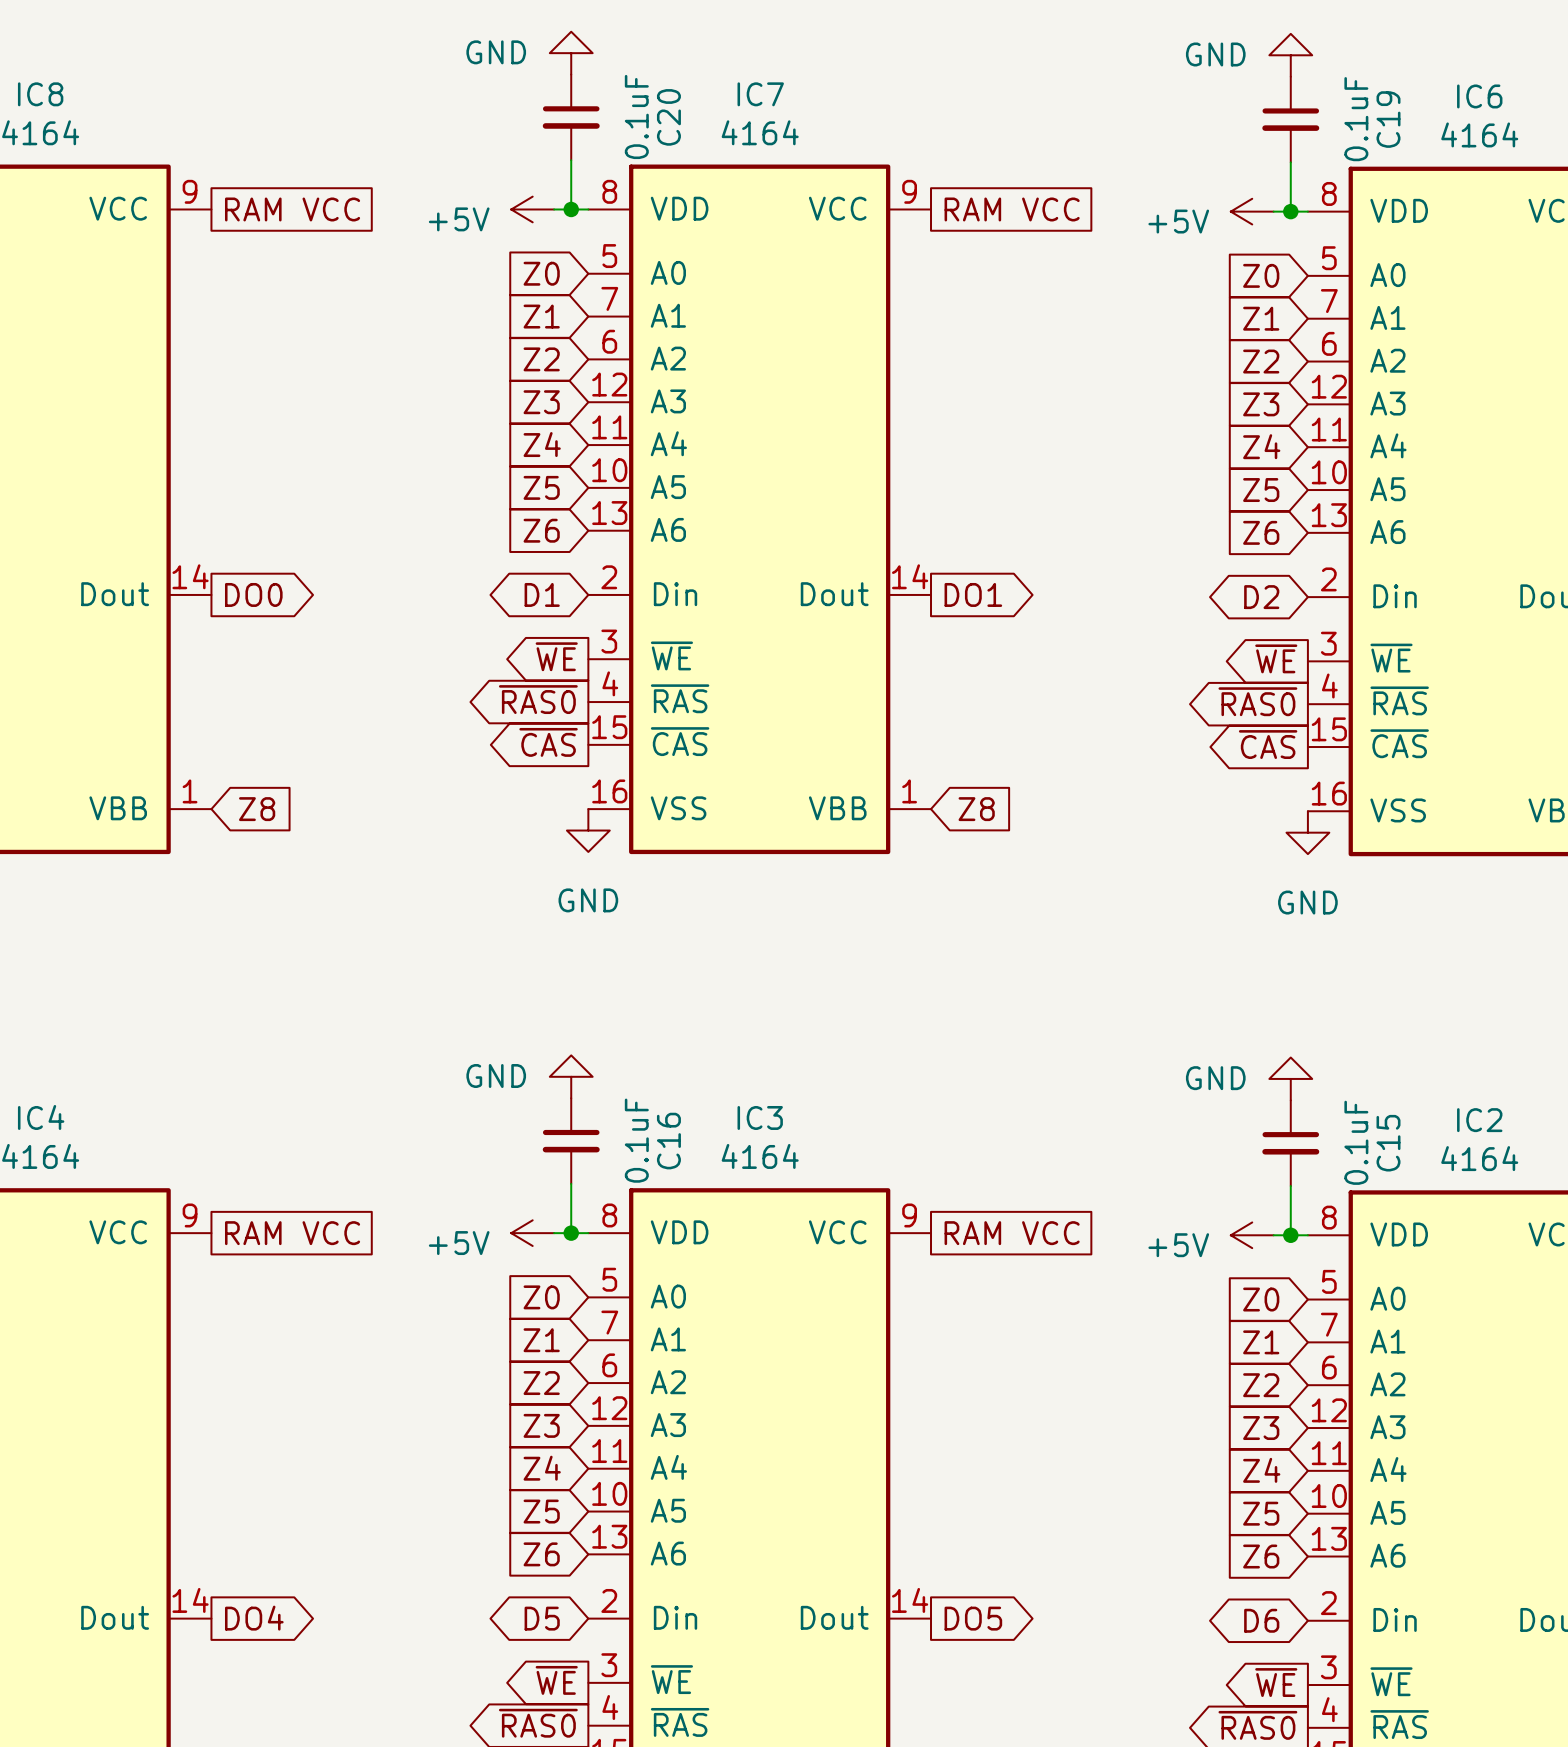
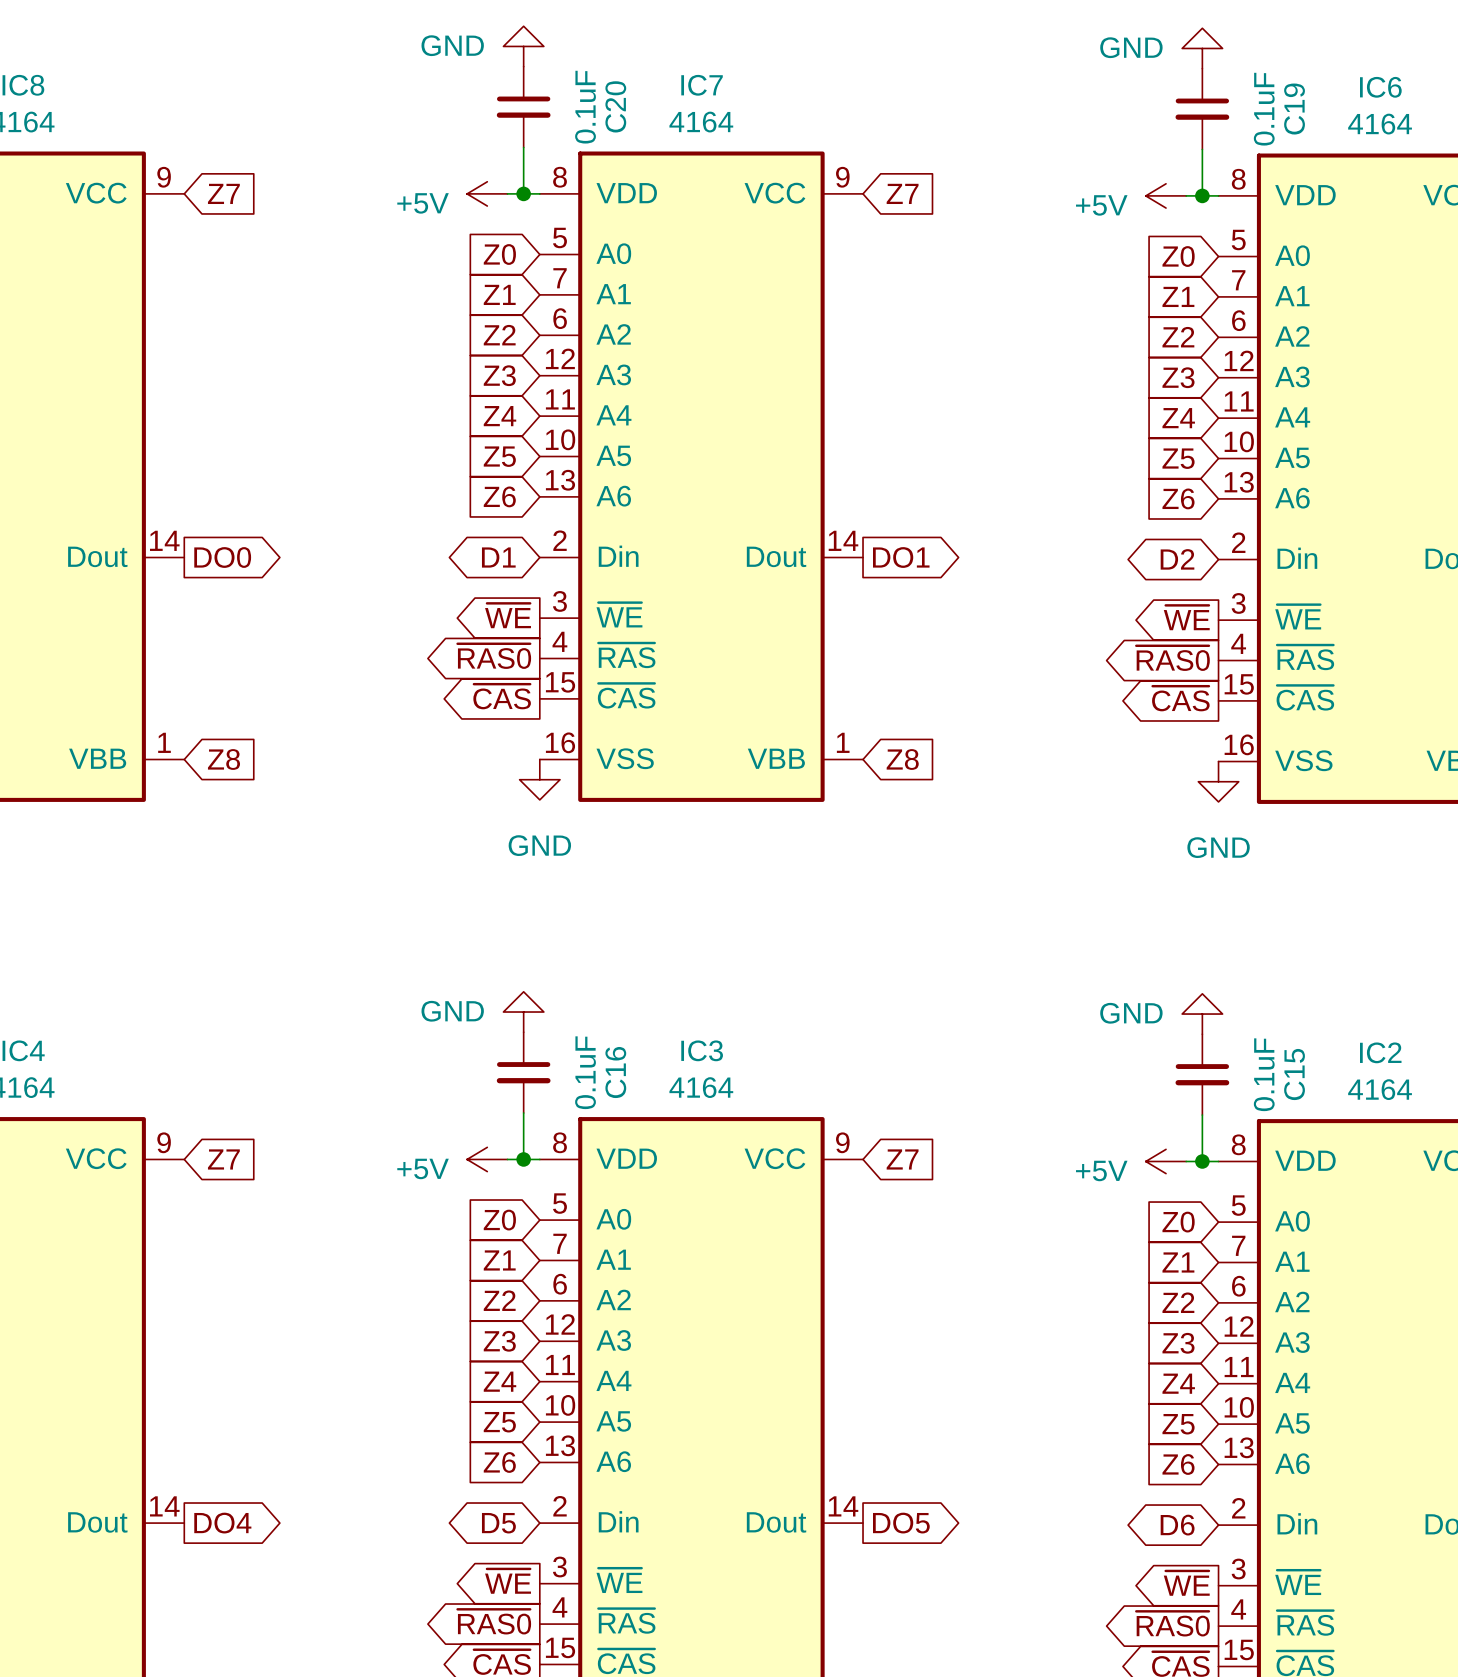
global label shape: passive (292, 209) -> input (223, 193)
global label: RAM VCC (292, 209) -> Z7 (223, 193)
global label shape: passive (1012, 209) -> input (902, 193)
global label: RAM VCC (1012, 209) -> Z7 (902, 193)
global label shape: passive (292, 1233) -> input (223, 1159)
global label: RAM VCC (292, 1233) -> Z7 (223, 1159)
global label shape: passive (1012, 1233) -> input (902, 1159)
global label: RAM VCC (1012, 1233) -> Z7 (902, 1159)

